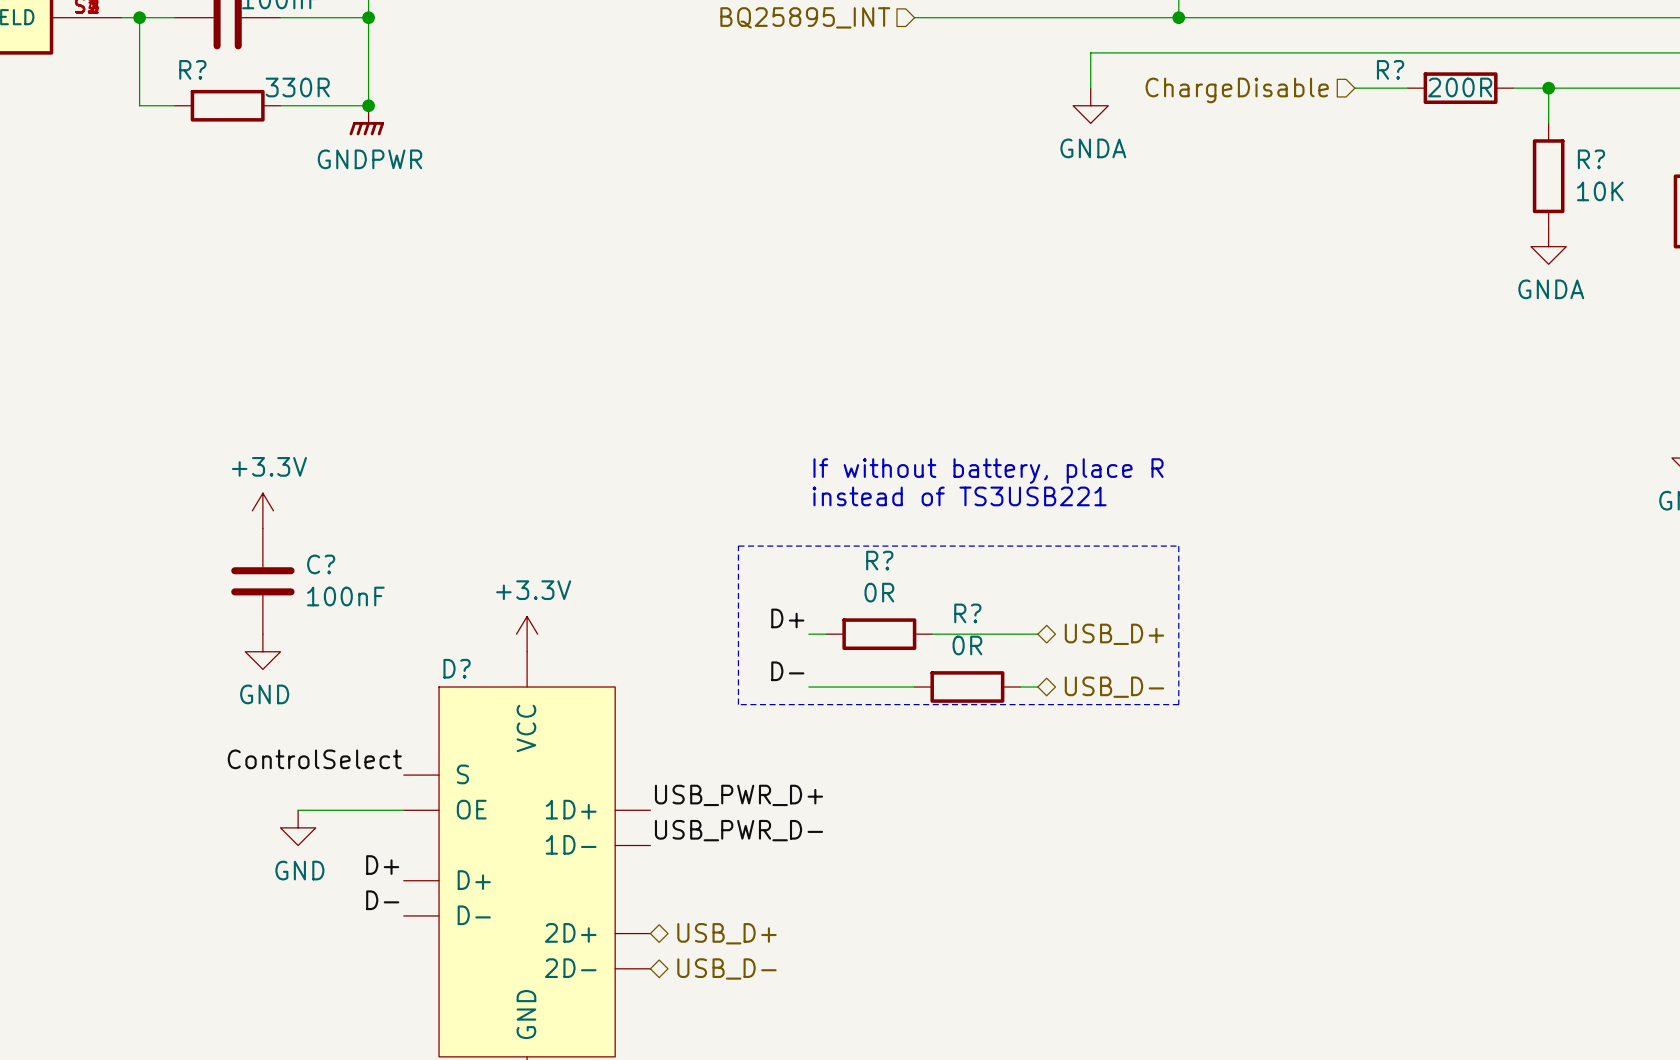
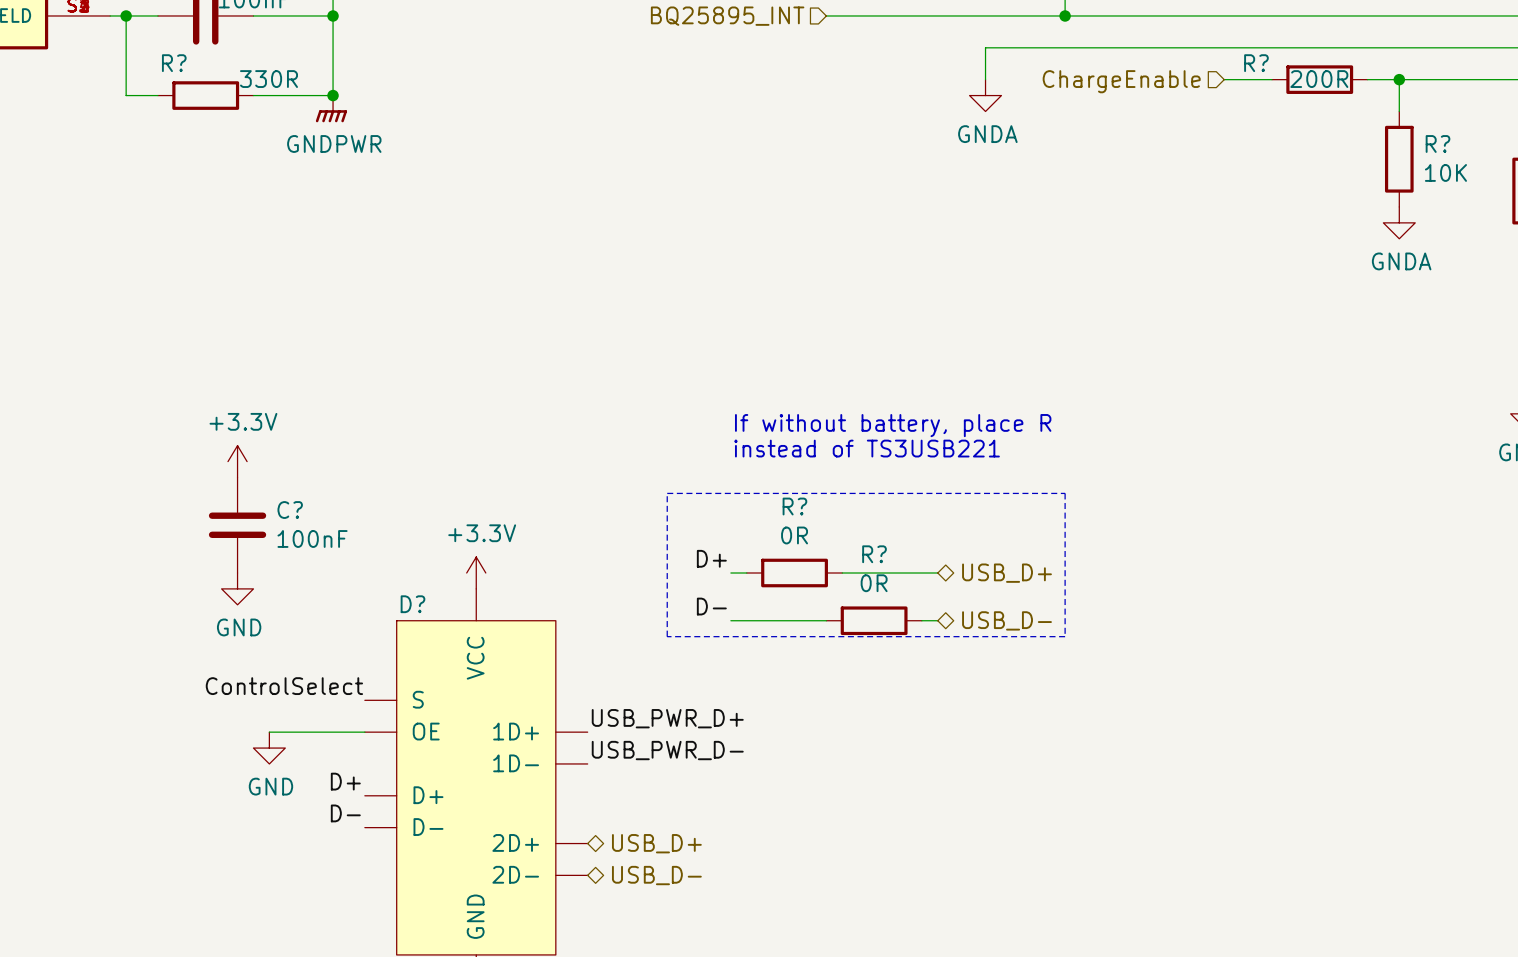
hierarchical label: ChargeDisable (1237, 90) -> ChargeEnable (1121, 81)

